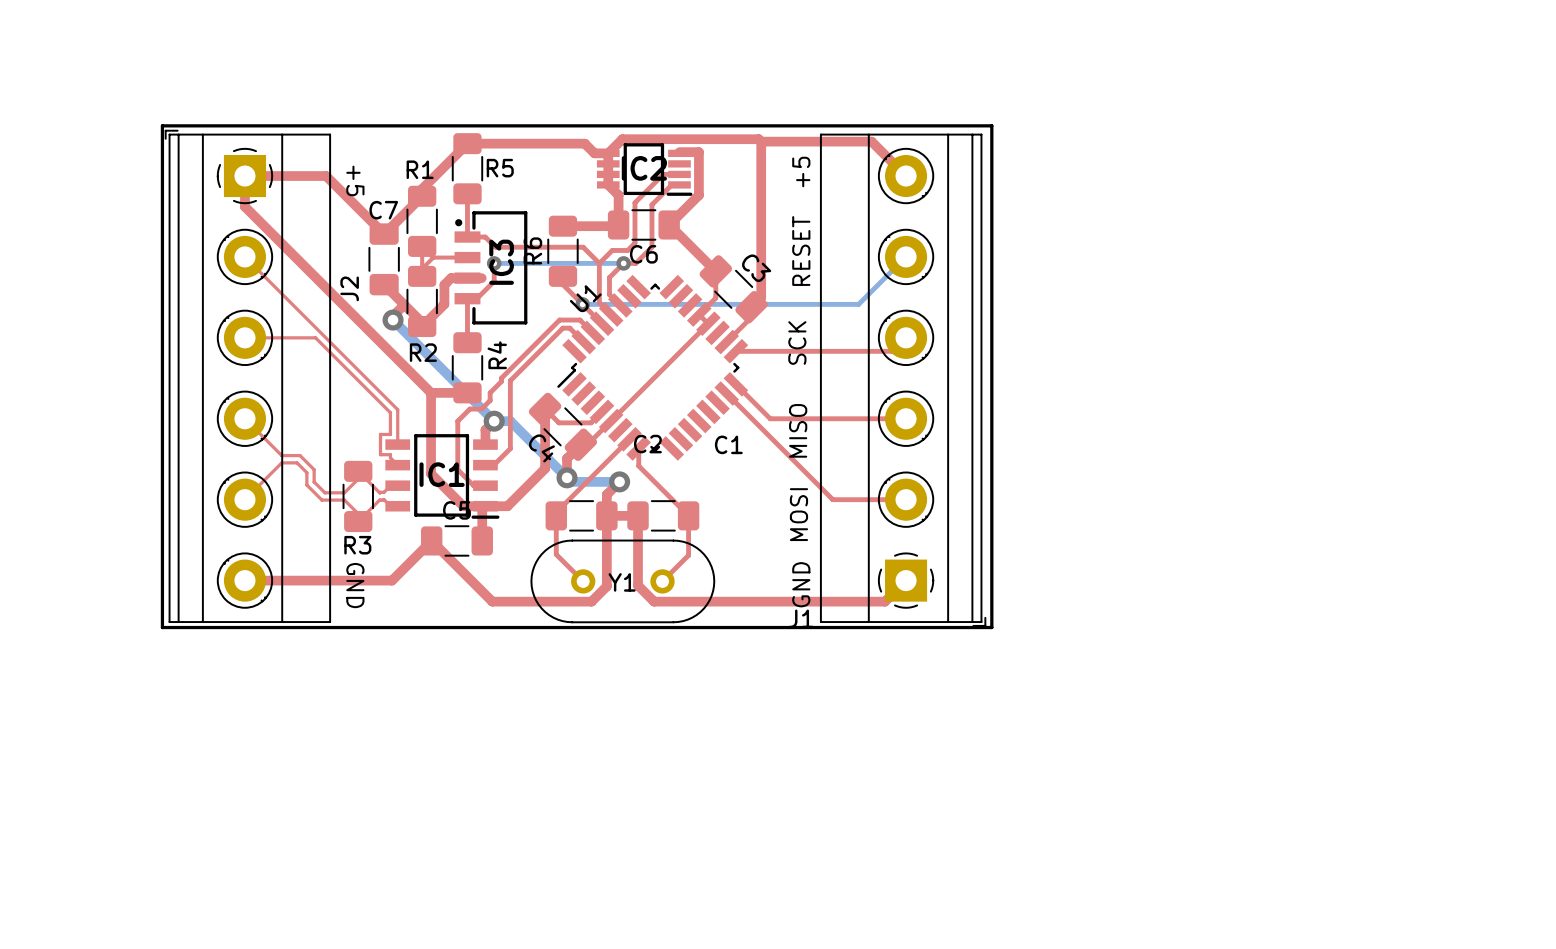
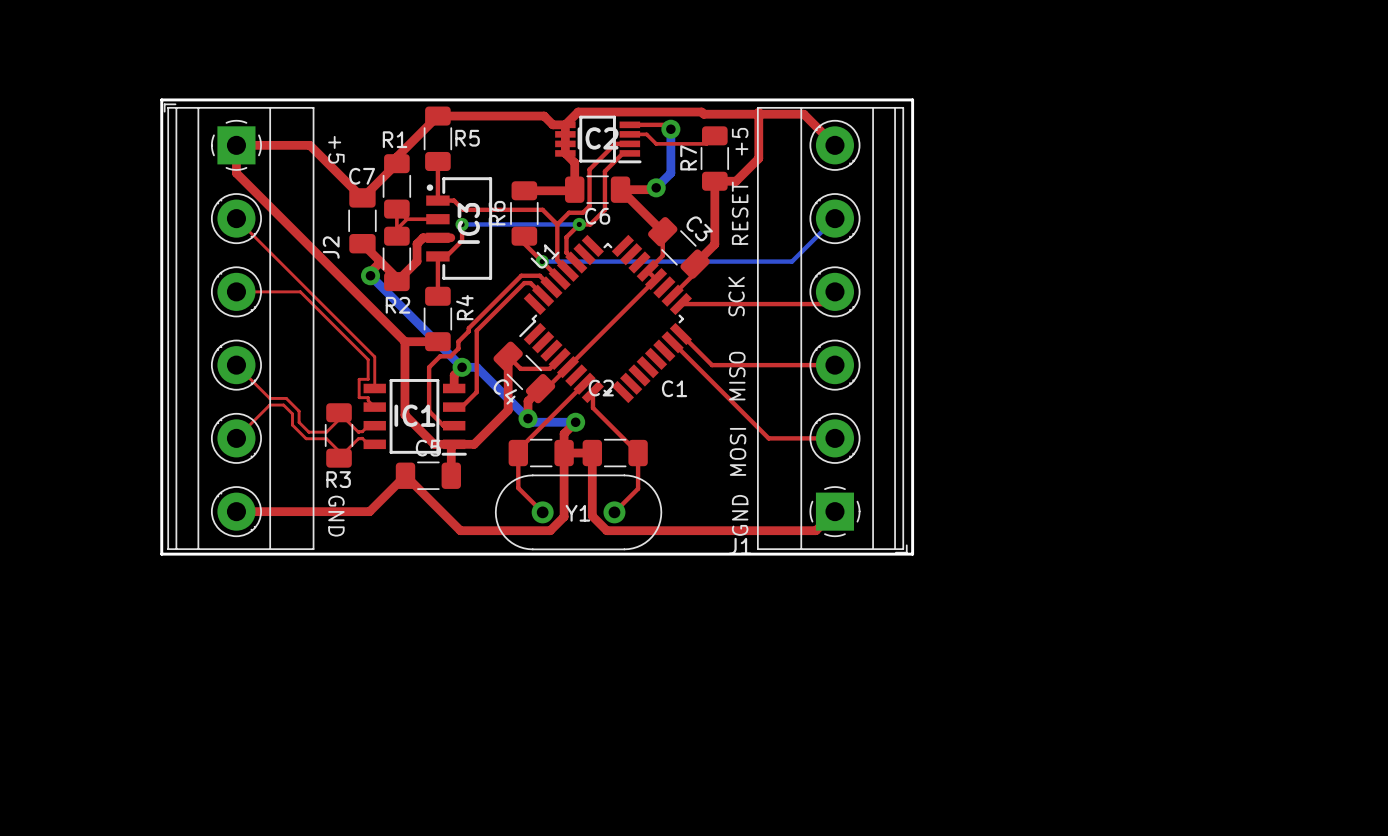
top track: (761, 141) (761, 297) -> (758, 112) (758, 158) (736, 181) (714, 181) (714, 244) (703, 255)
top track: (679, 152) (698, 152) (698, 195) (669, 224) -> (656, 187) (654, 189) (620, 189)
top track: none -> (629, 124) (666, 124) (670, 129)
bottom track: none -> (670, 129) (670, 173) (656, 187)
via: none -> (670, 129)
top track: none -> (629, 134) (646, 134) (656, 143) (706, 143) (714, 135)
R7: none -> (714, 158)
via: none -> (656, 187)

